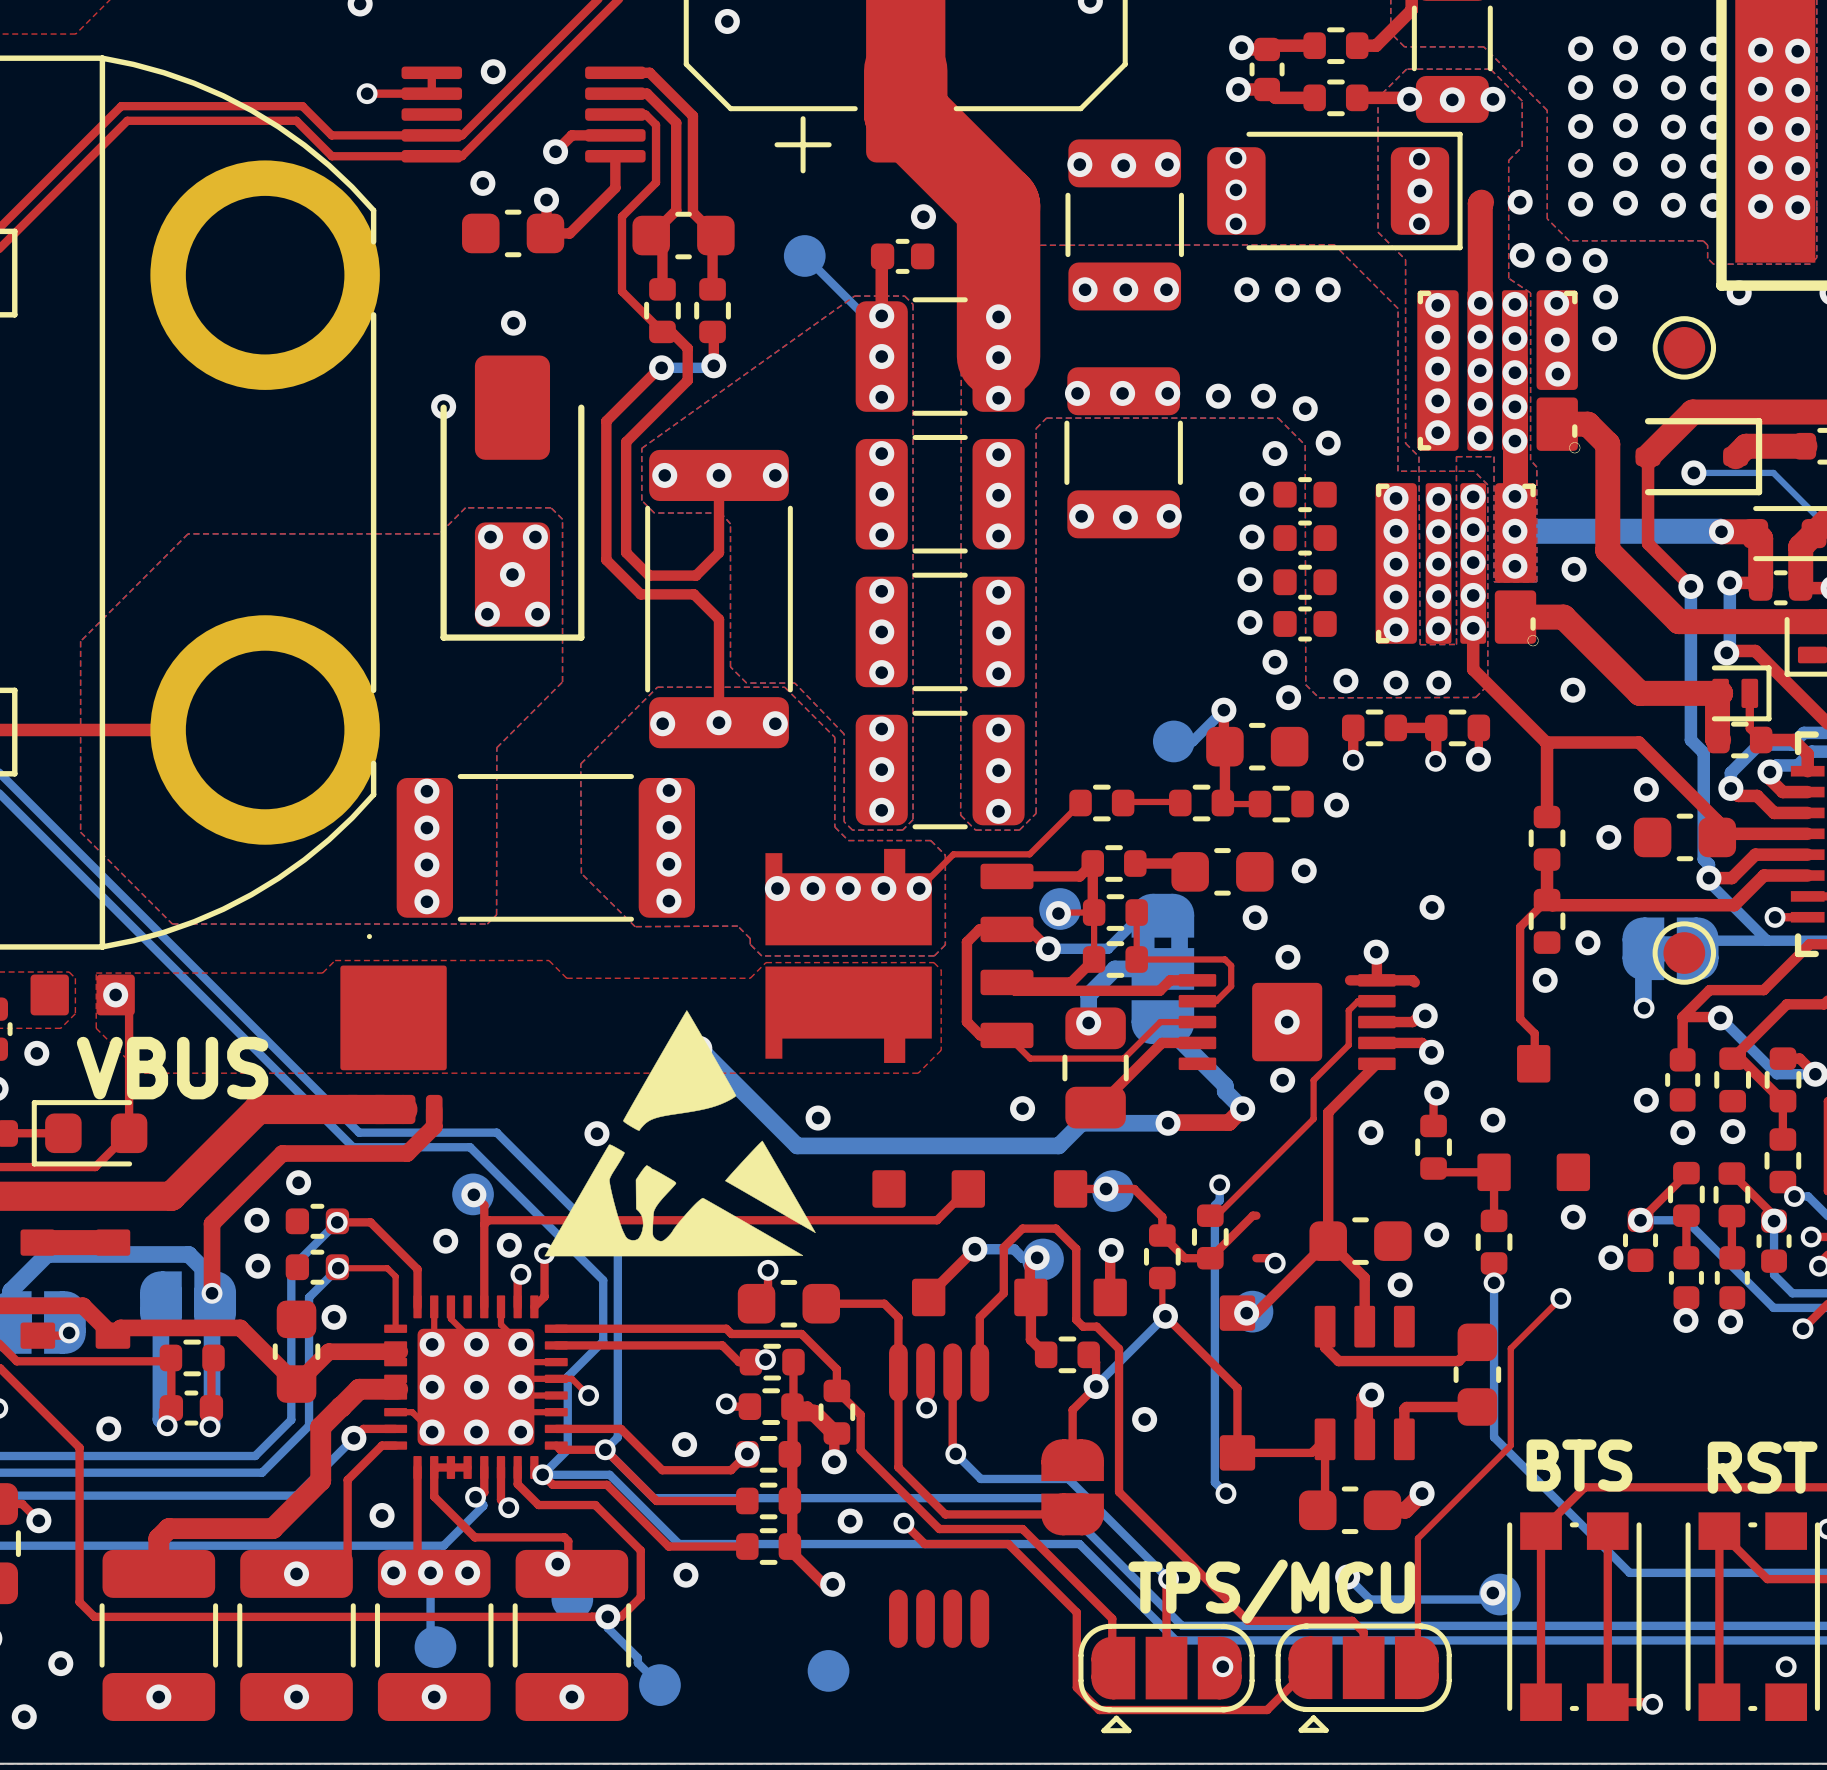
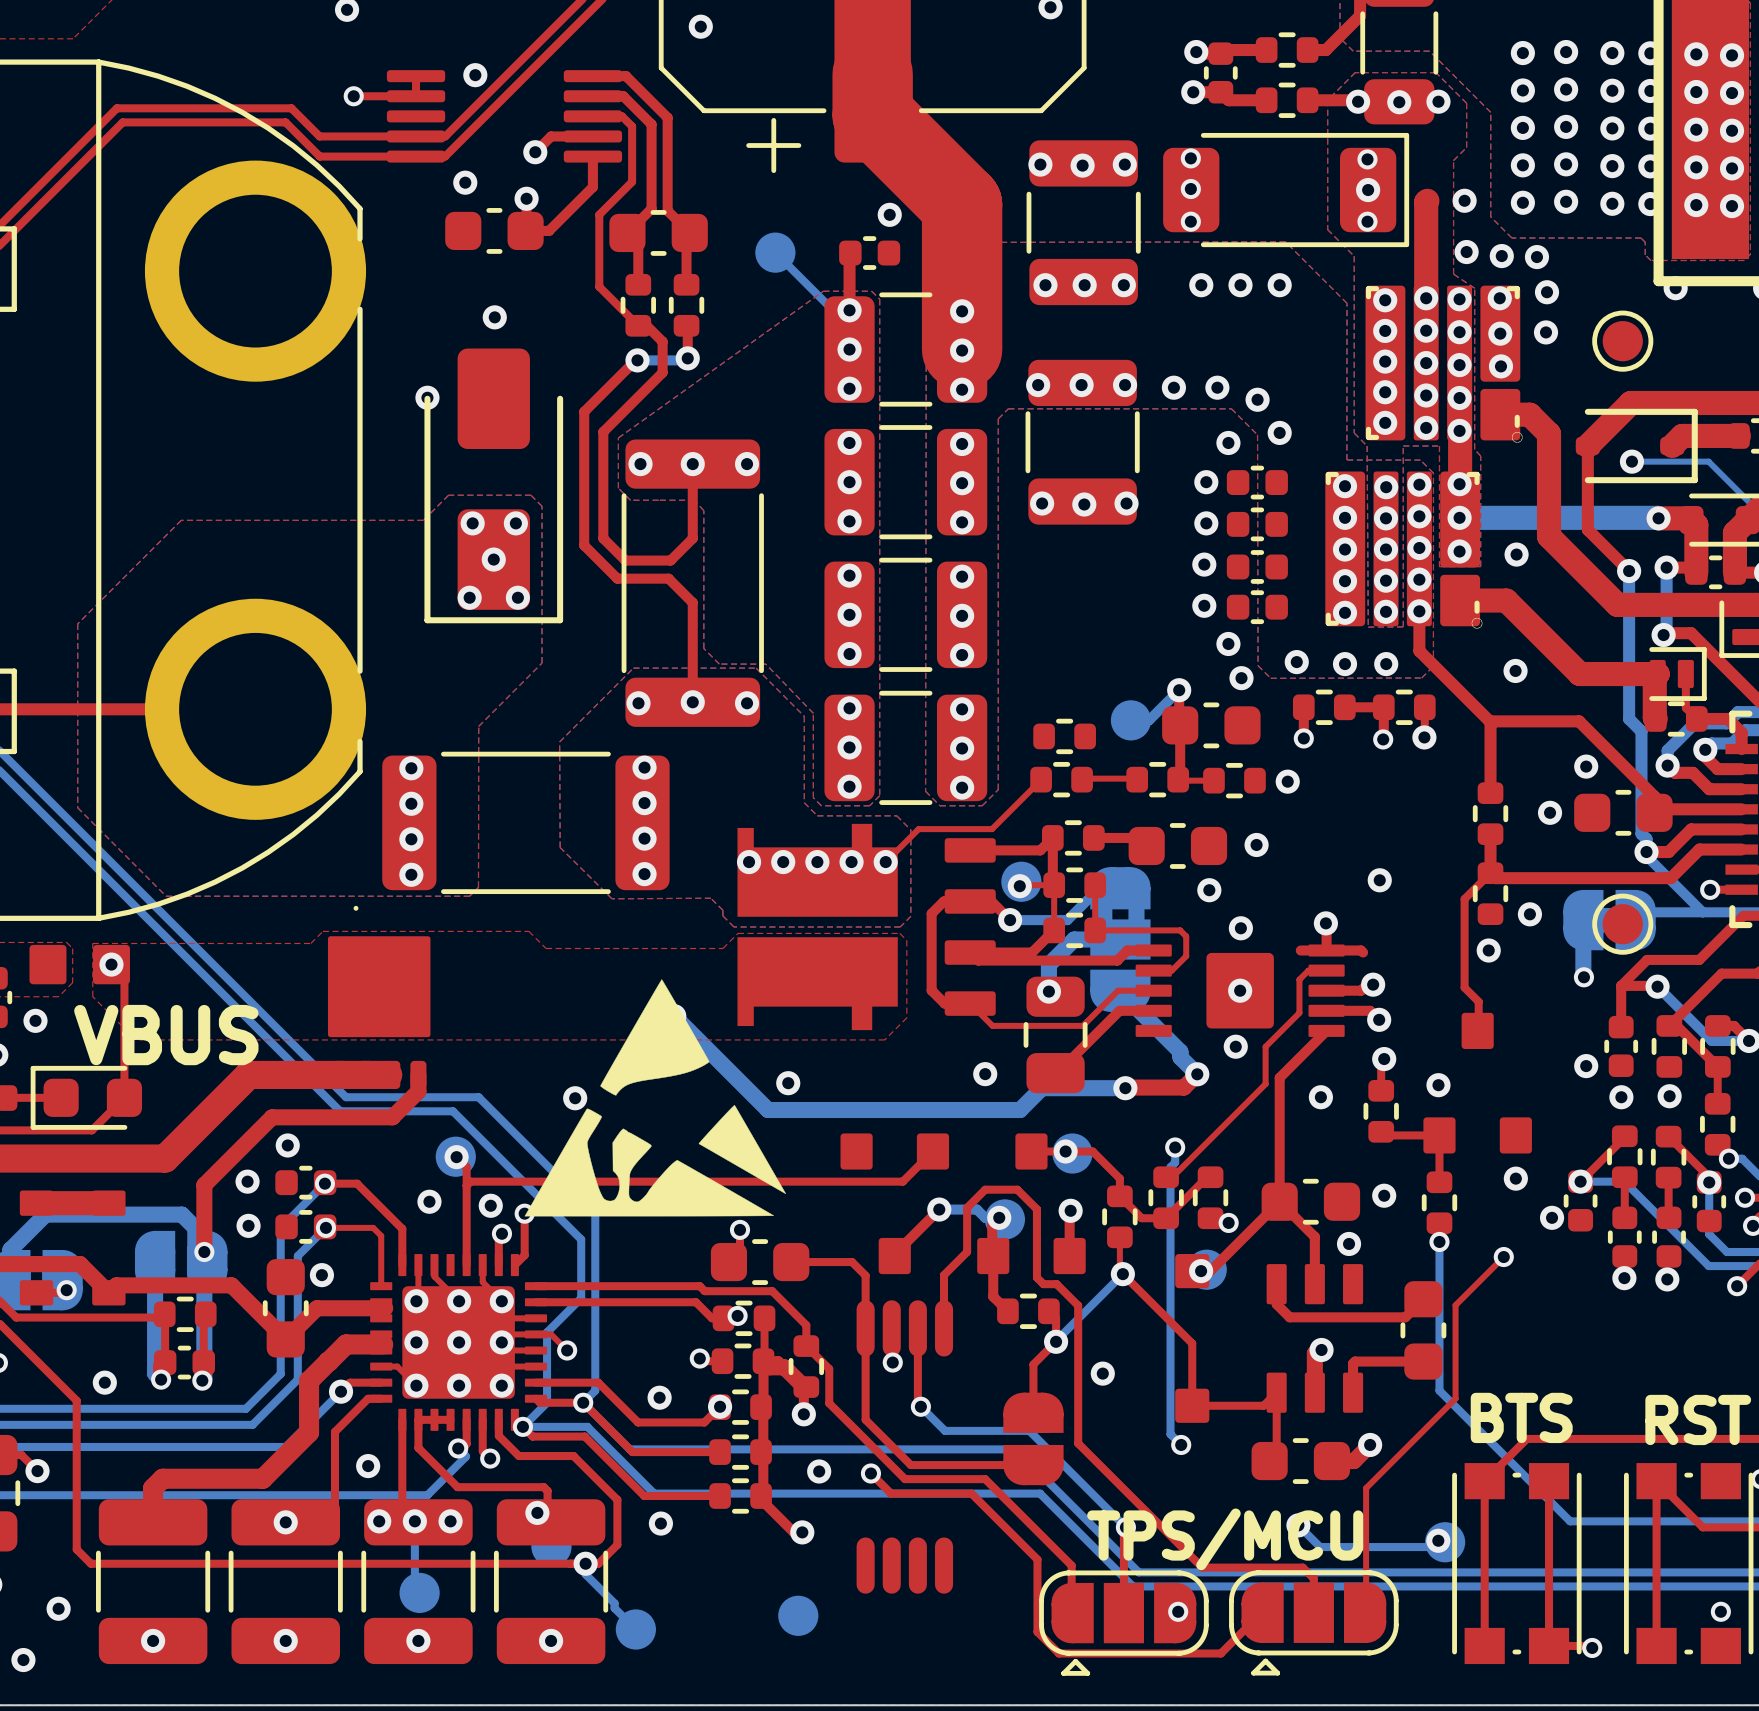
part: none -> (1064, 736)
part: none -> (1210, 1197)

